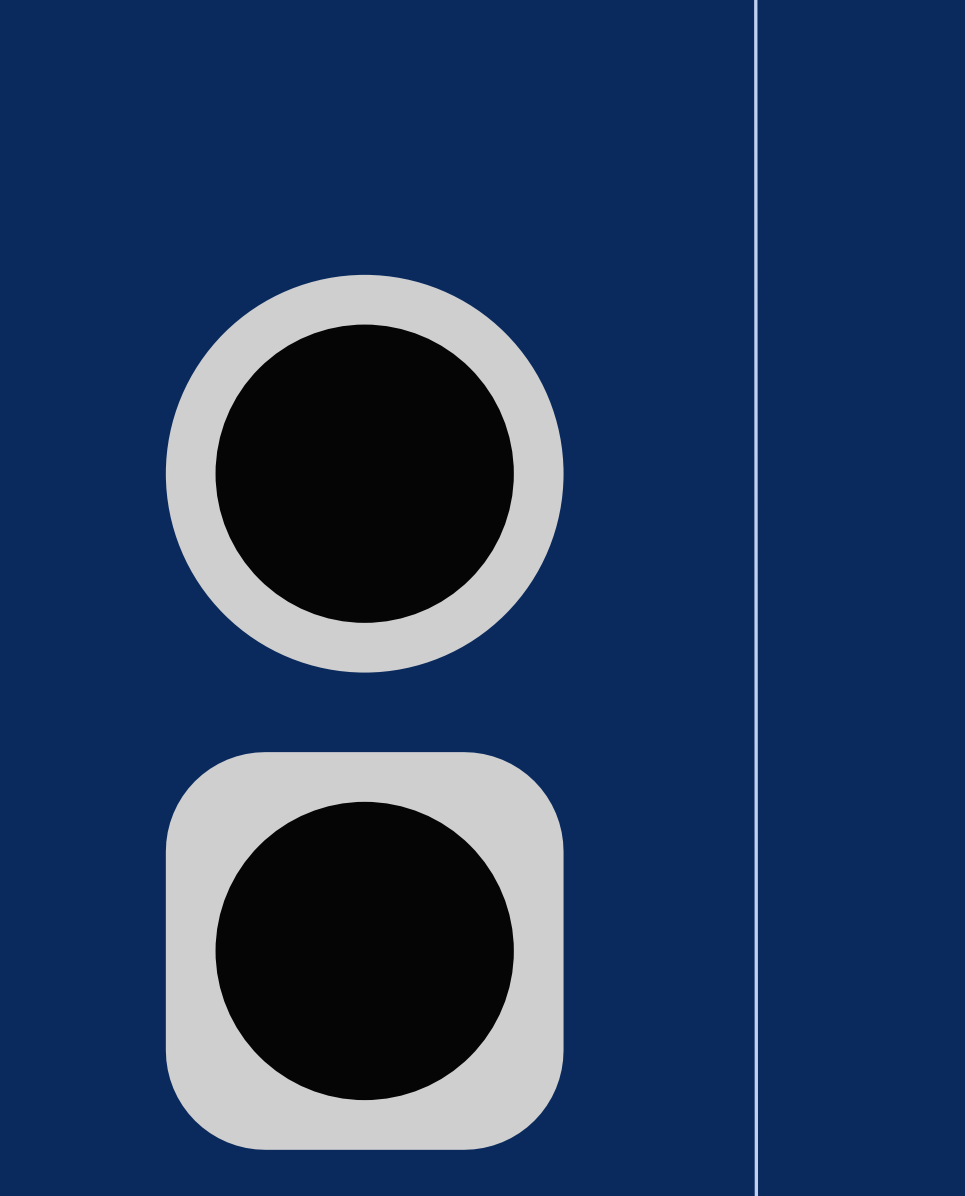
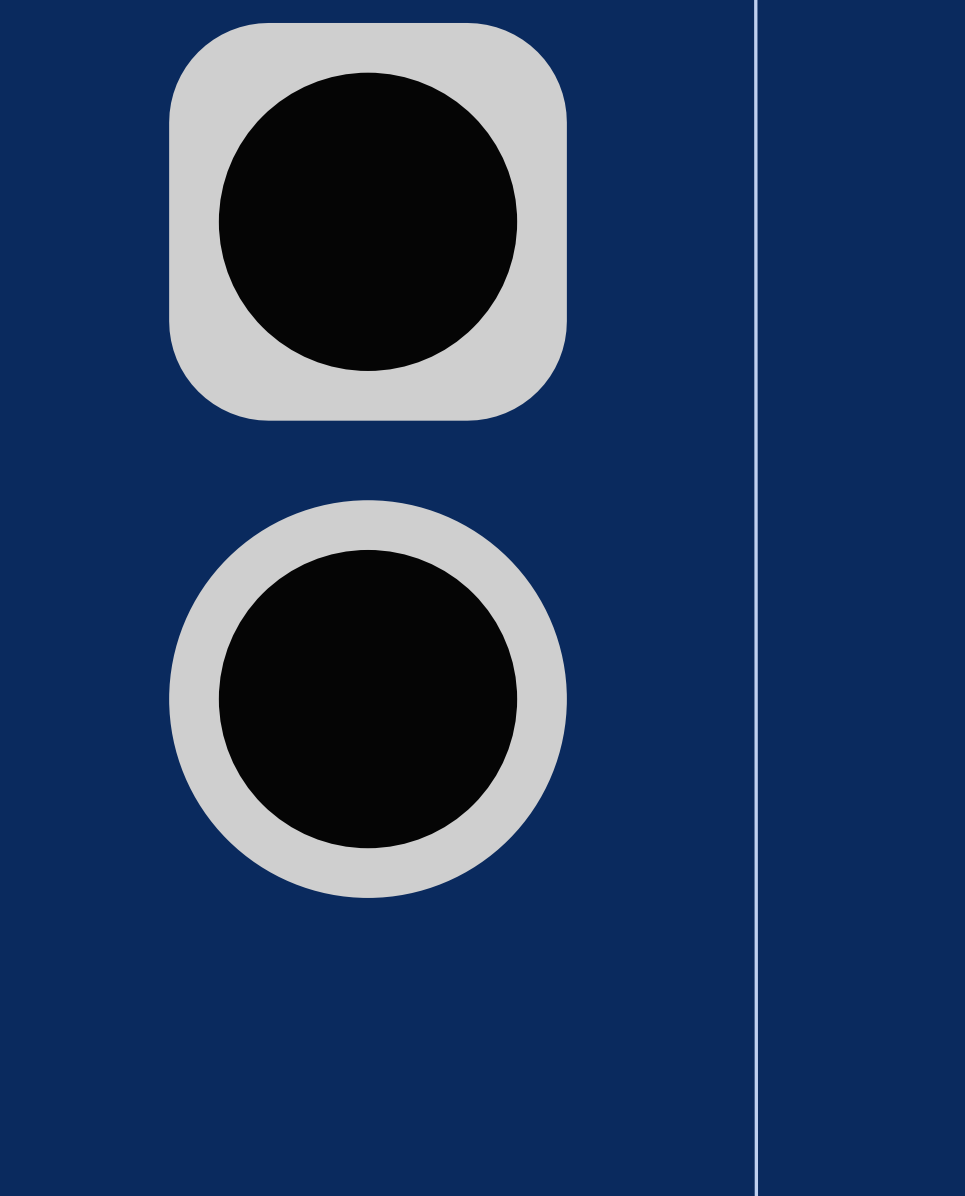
part rotation: 0° (364, 712) -> 180° (368, 460)

